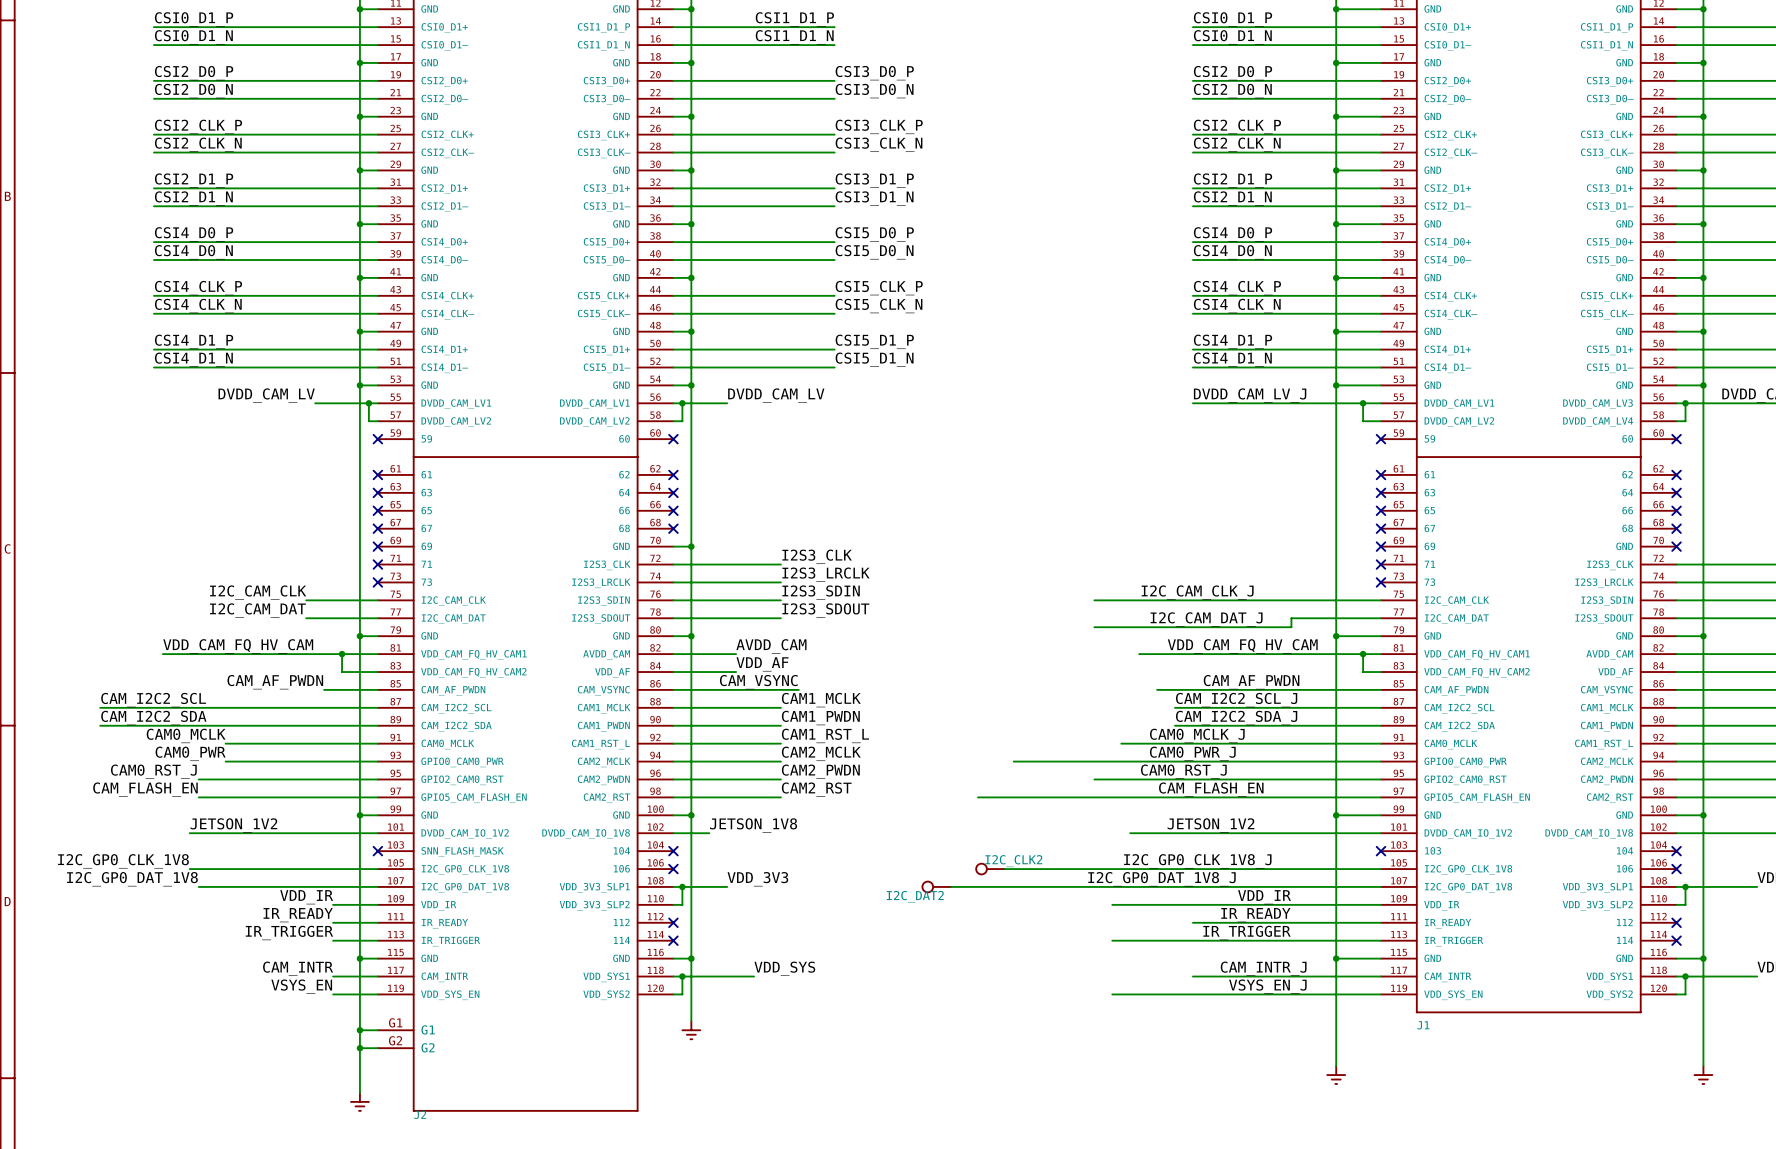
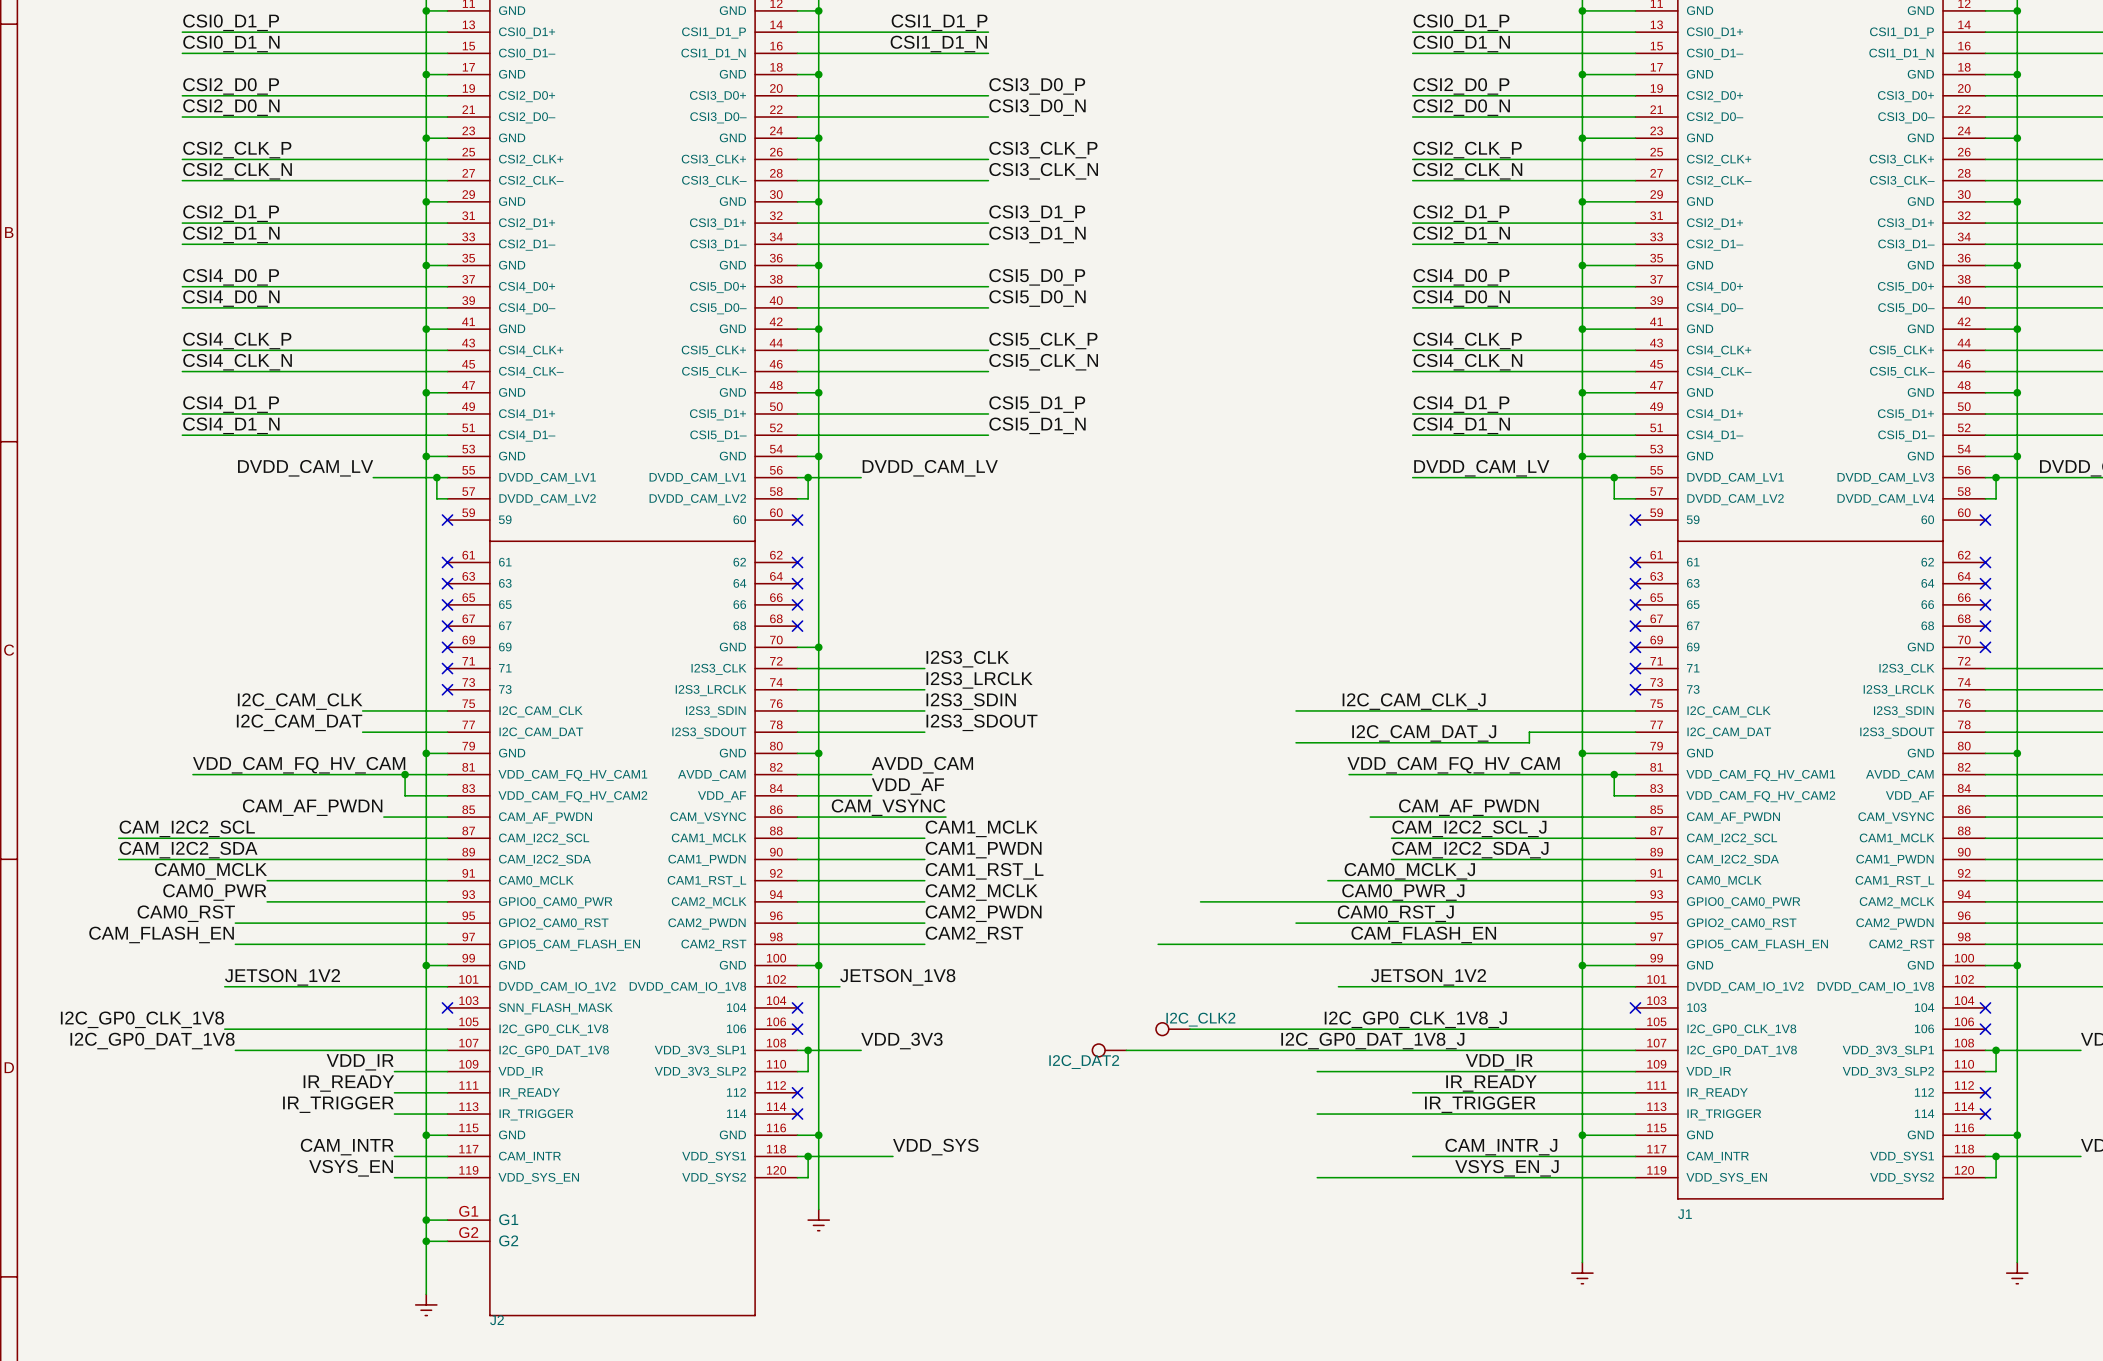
label: DVDD_CAM_LV_J (1250, 395) -> DVDD_CAM_LV (1481, 468)
label: CAM0_RST_J (153, 771) -> CAM0_RST (186, 913)

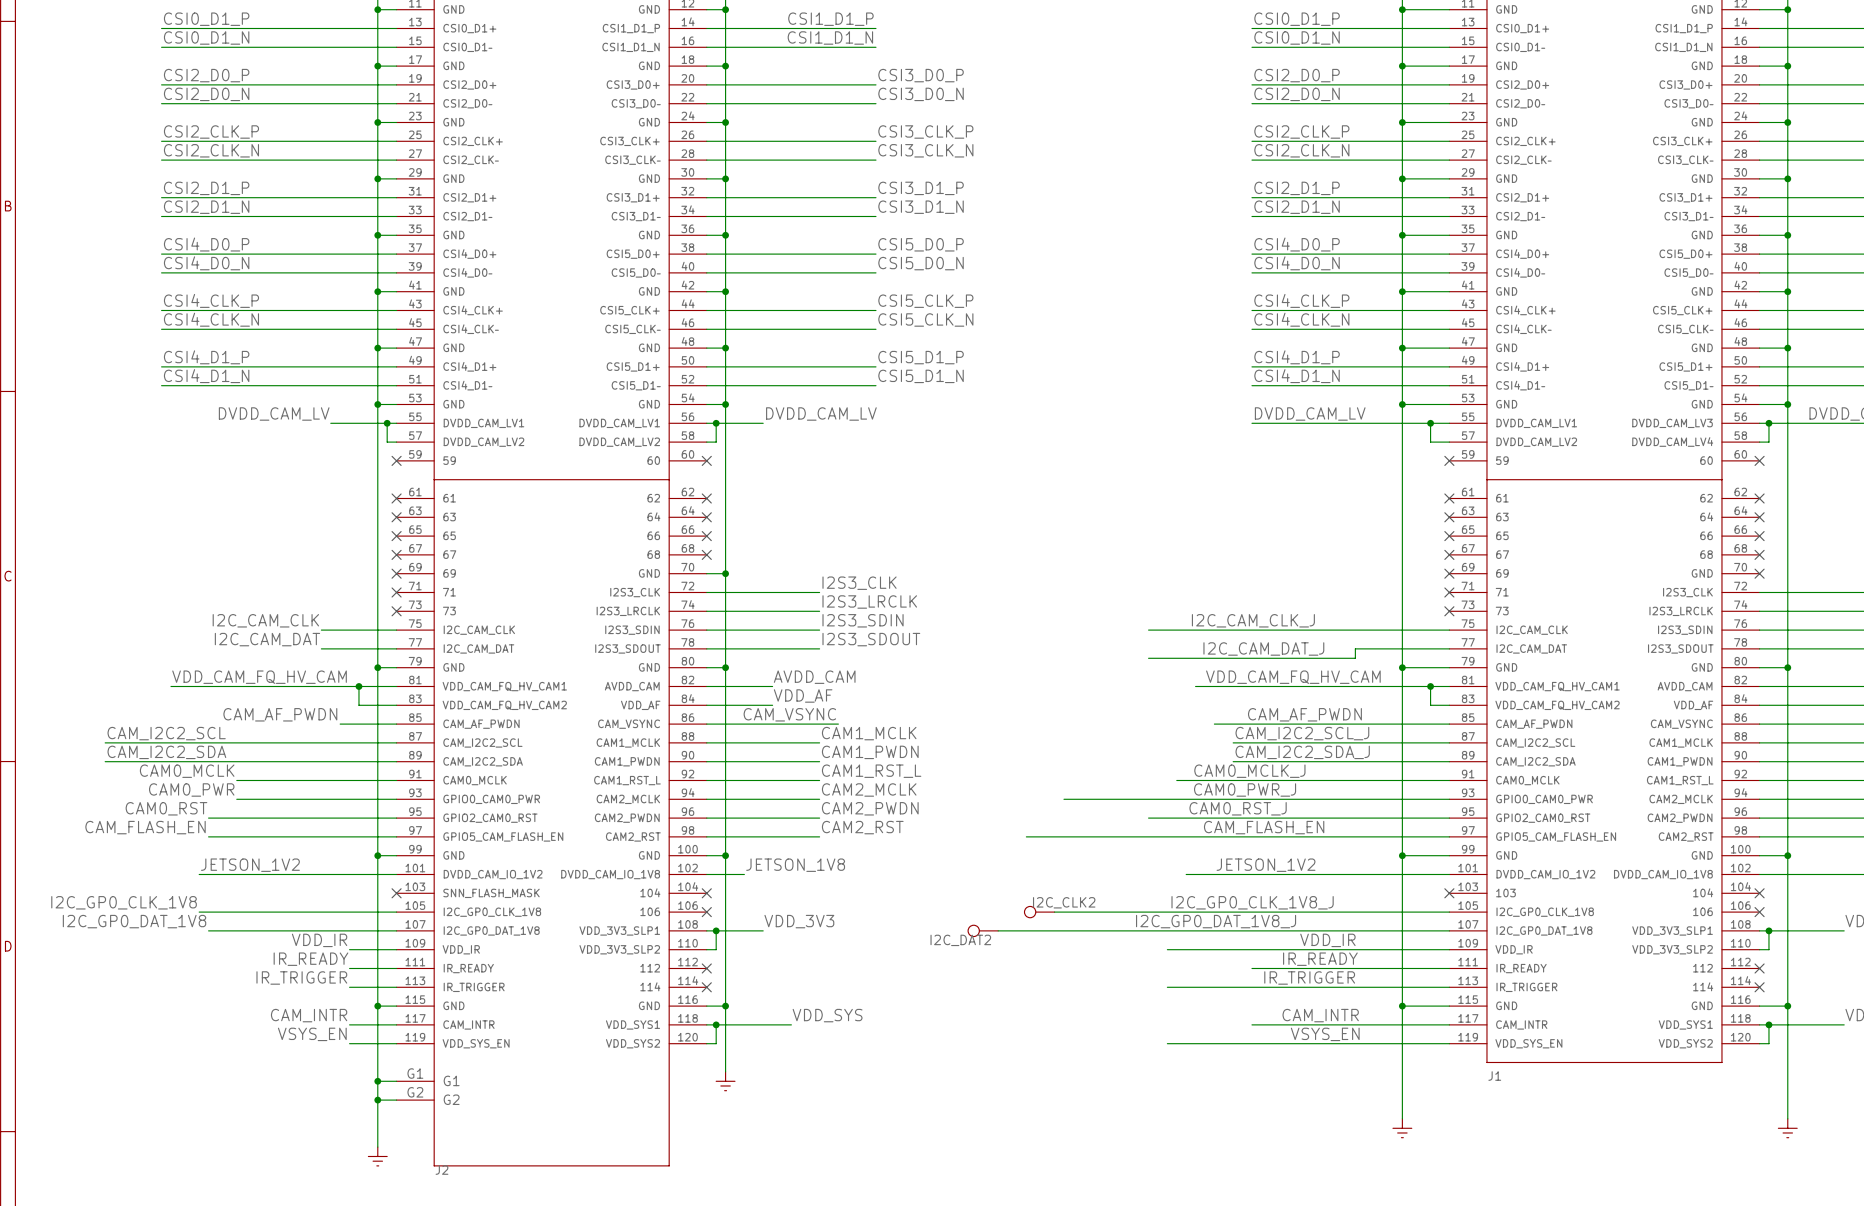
label: CAM_INTR_J (1501, 1147) -> CAM_INTR (1320, 1015)
label: VSYS_EN_J (1506, 1168) -> VSYS_EN (1325, 1034)

